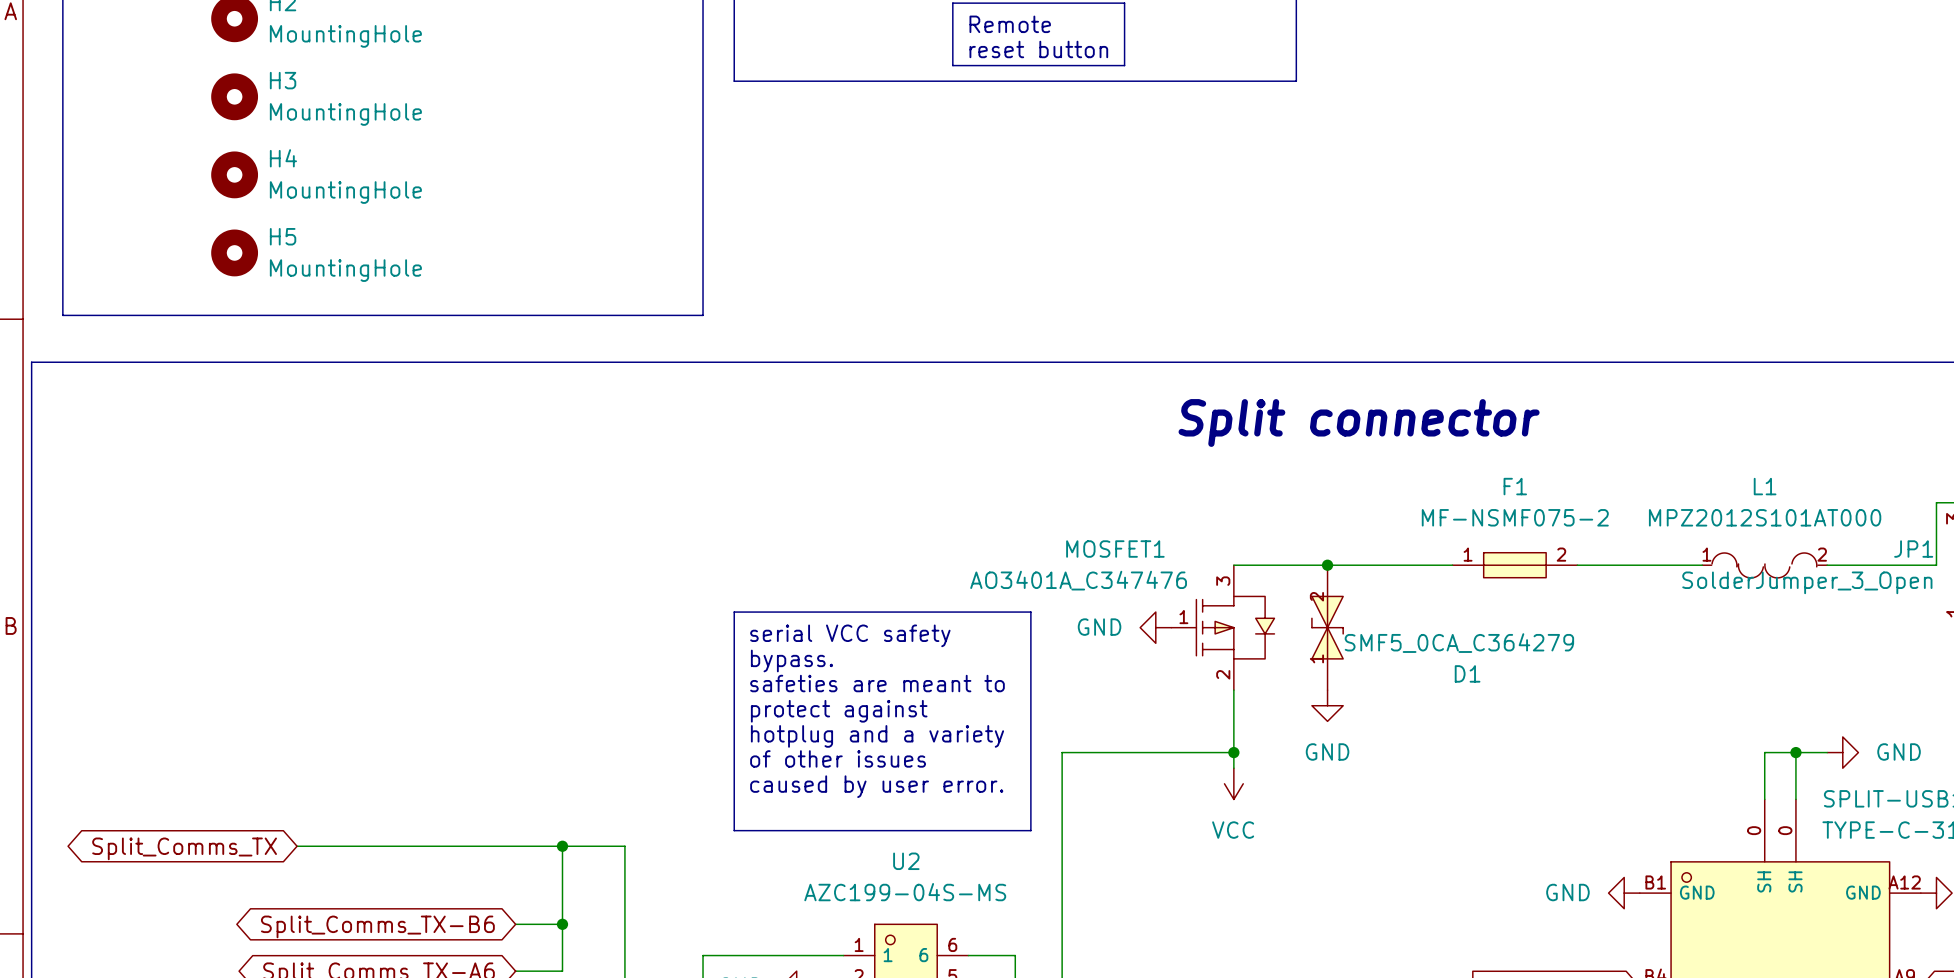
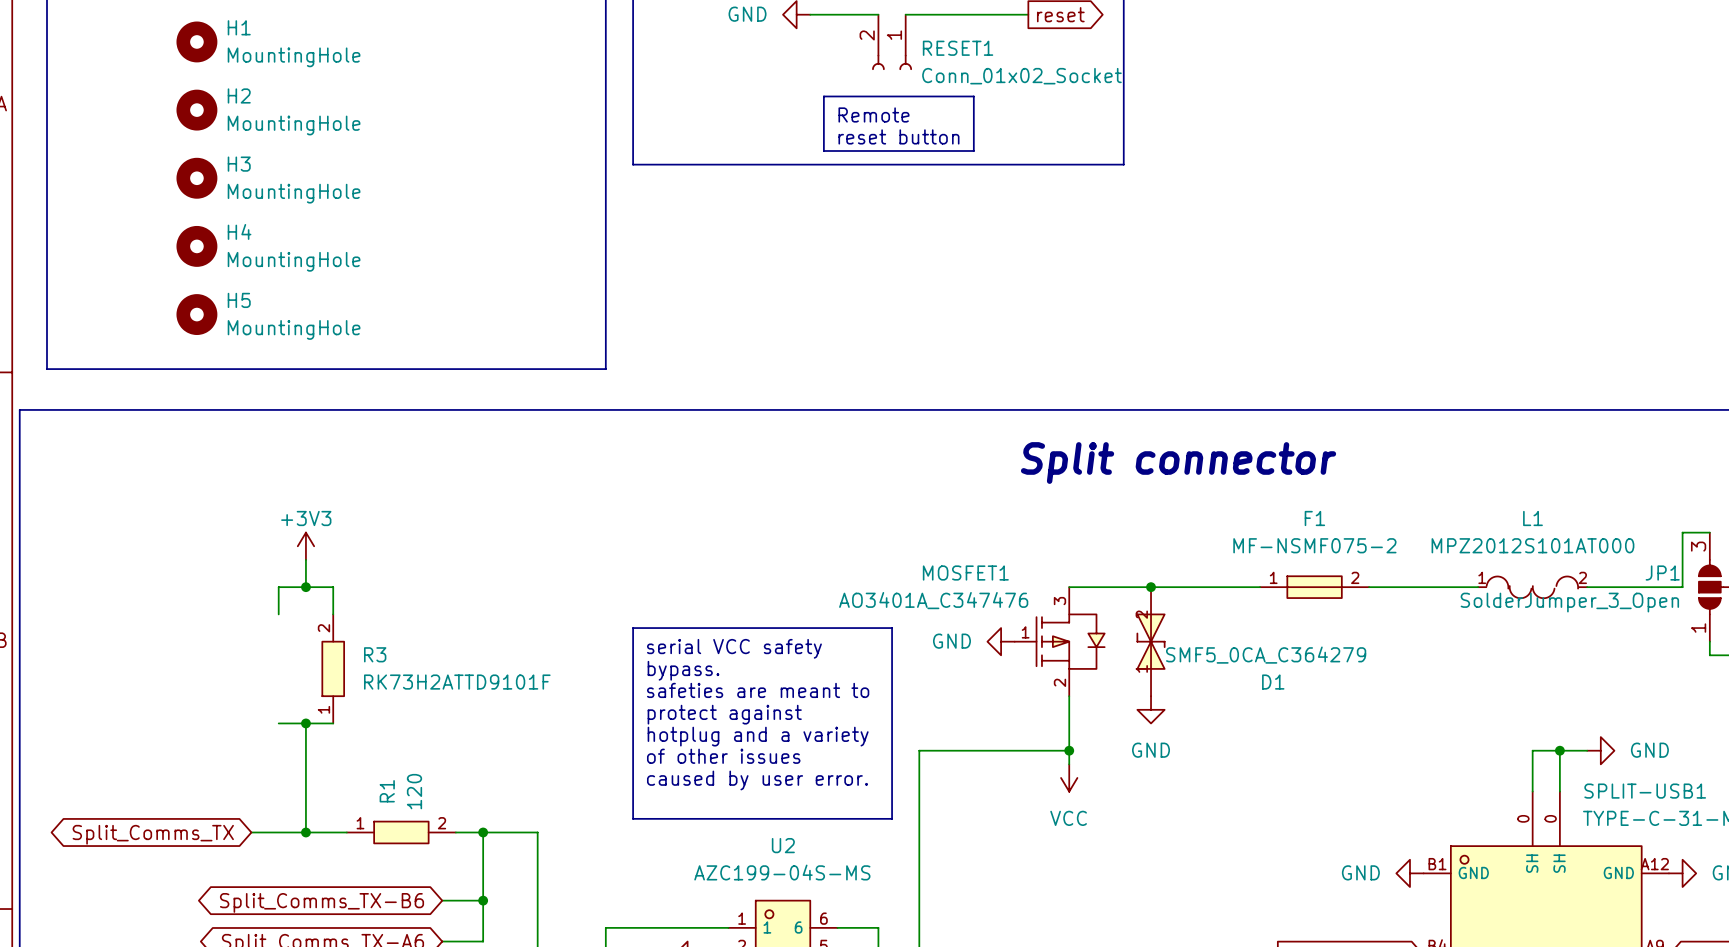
power symbol: none -> +3V3 (305, 546)
wire: none -> (305, 559) (305, 587)
junction: none -> (305, 587)
wire: none -> (278, 614) (278, 587) (333, 587) (333, 614)
R3: none -> RK73H2ATTD9101F (333, 668)
wire: none -> (278, 723) (333, 723)
wire: none -> (305, 723) (305, 832)
junction: none -> (305, 723)
junction: none -> (305, 832)
R1: none -> 120 (401, 832)

